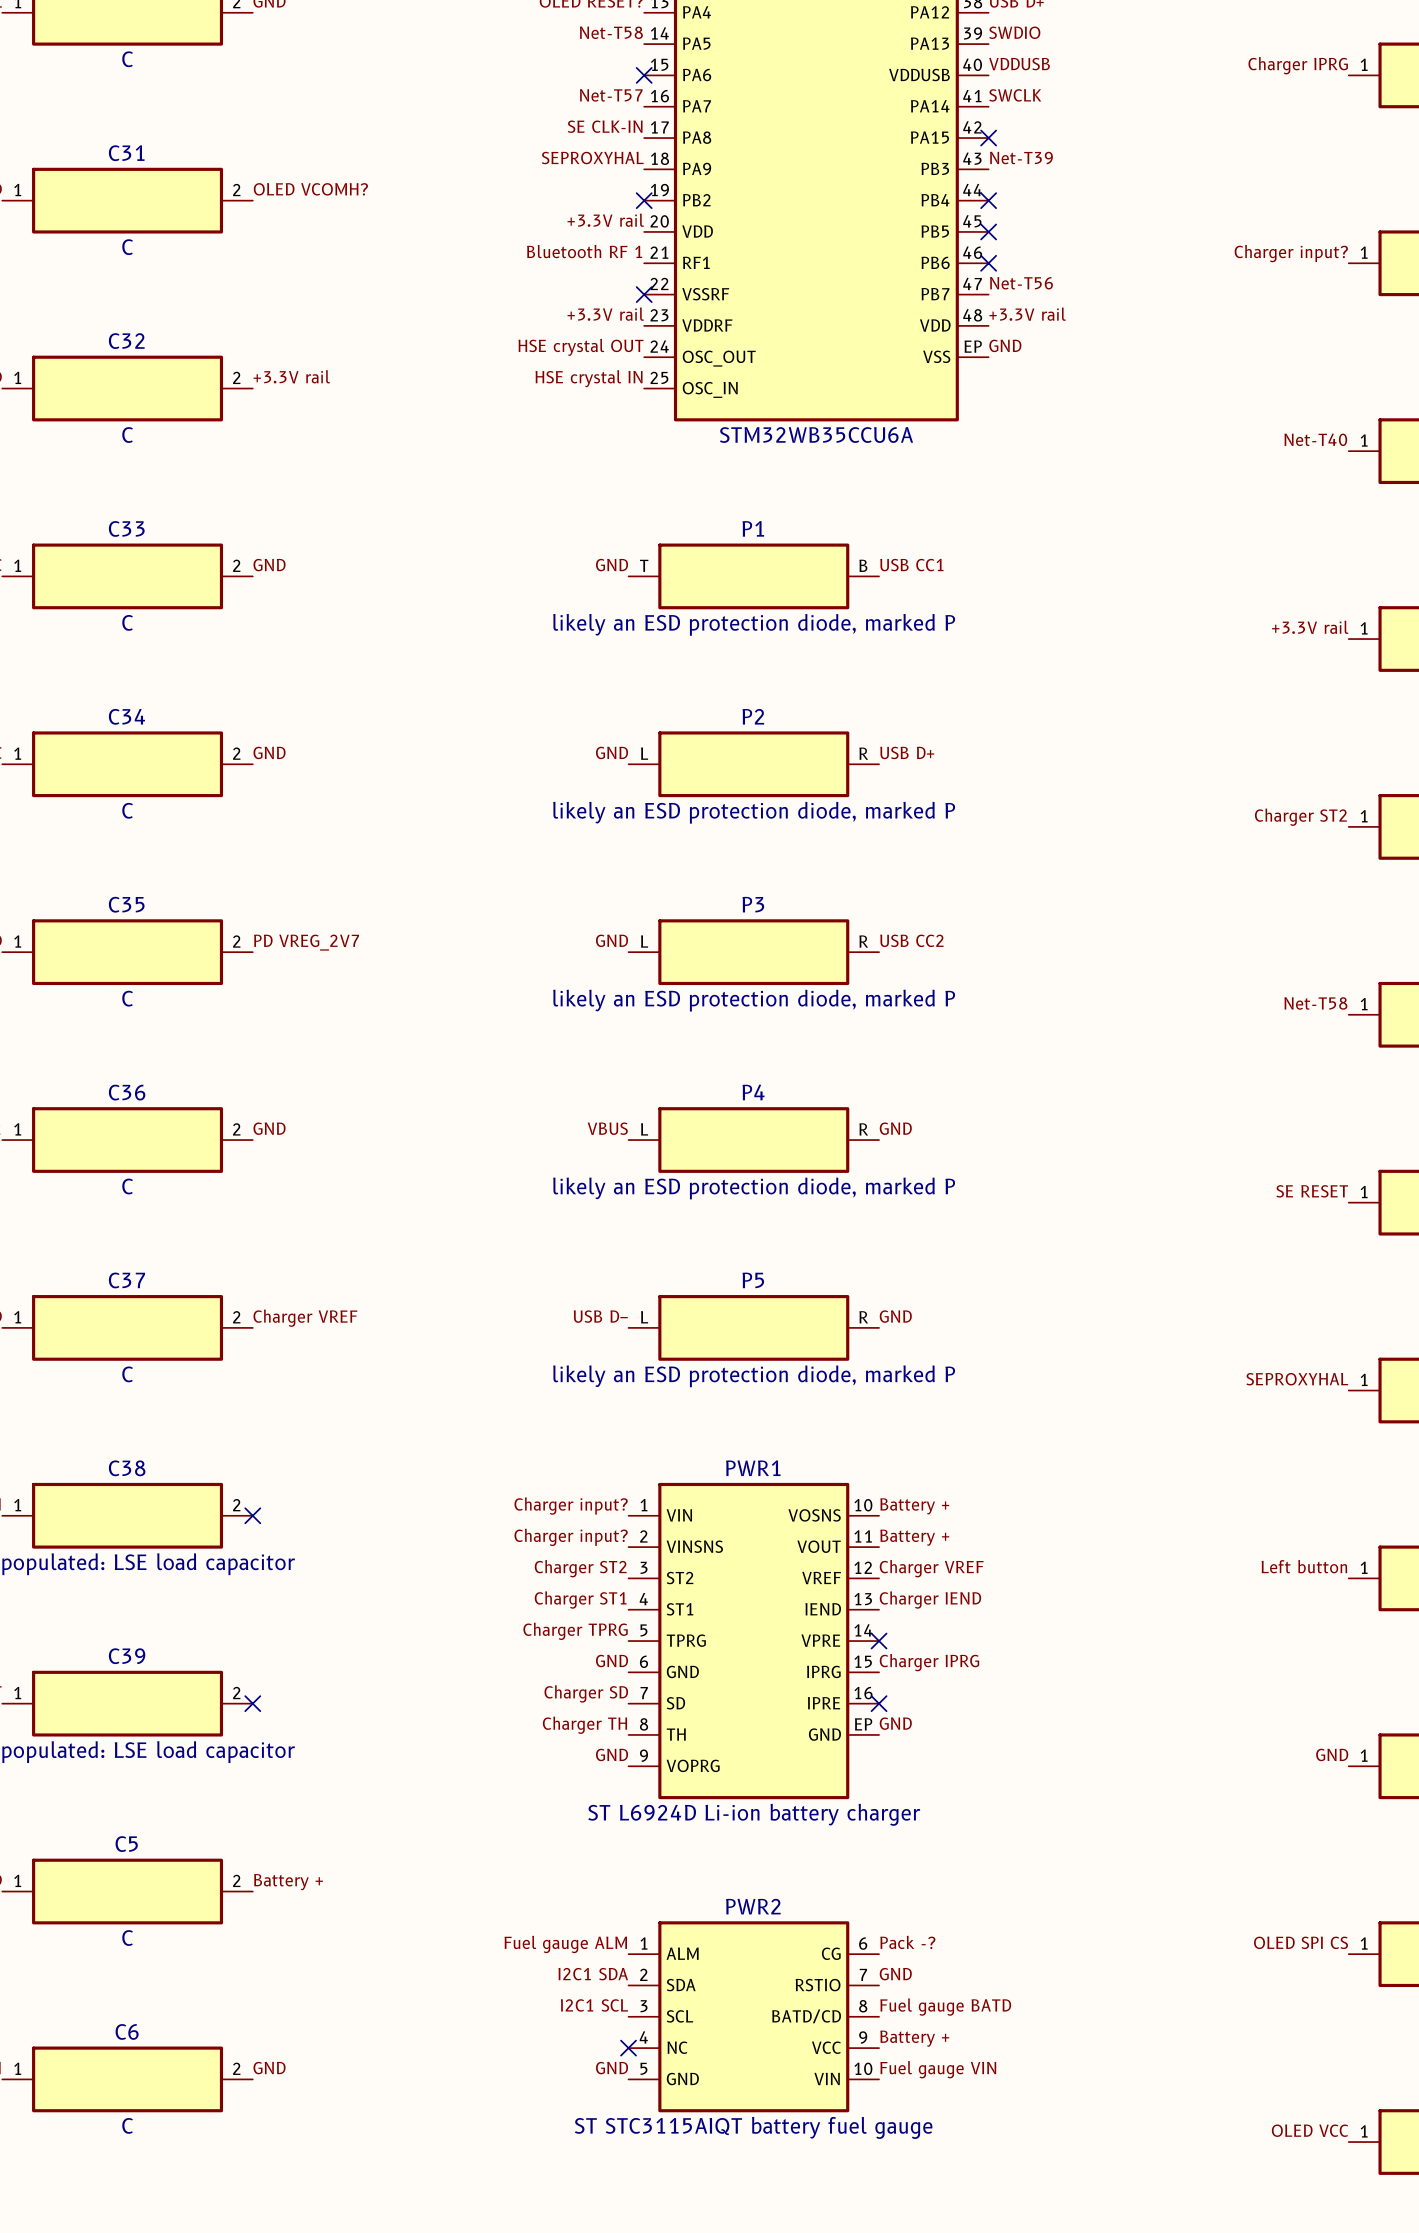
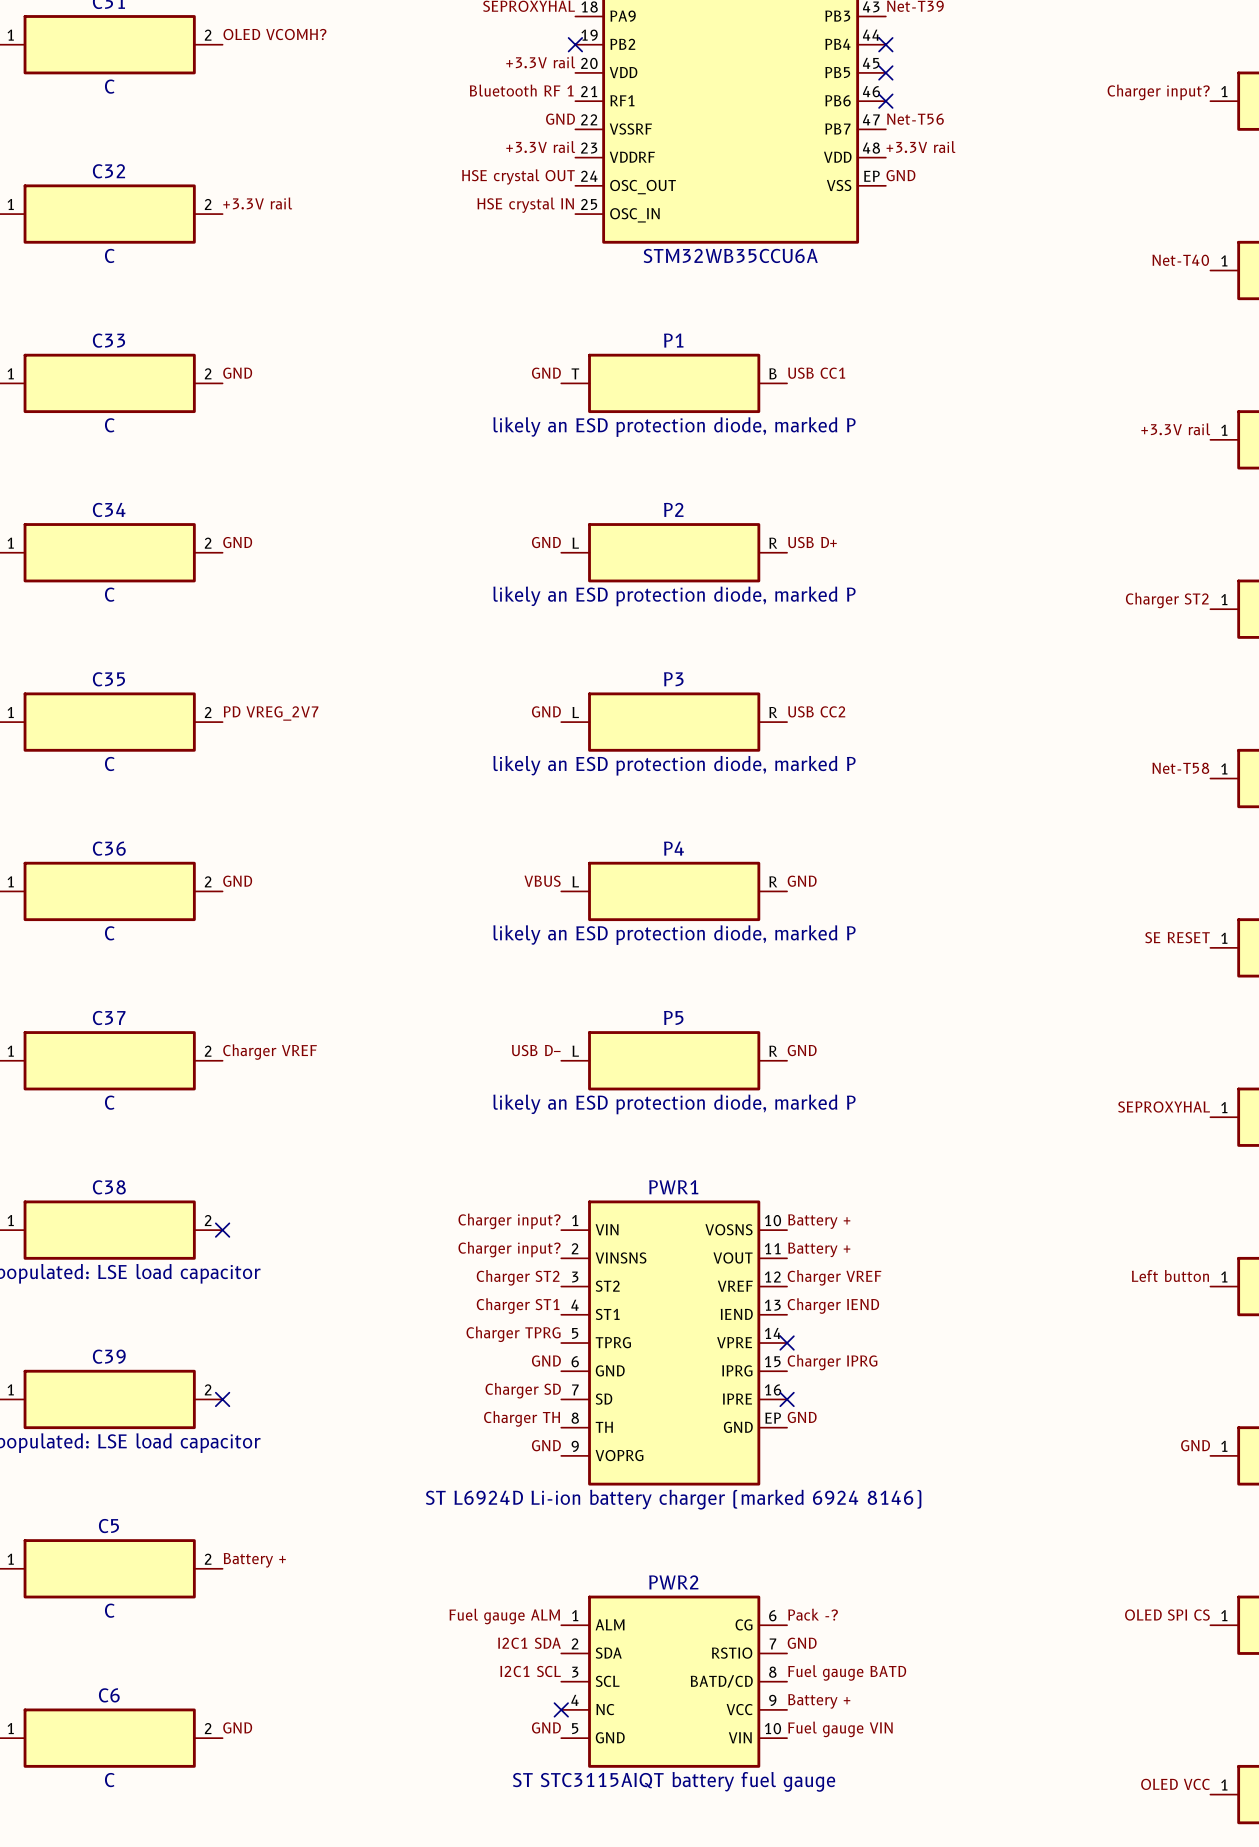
label: none -> GND (560, 119)
no-connect mark: (644, 294) -> none
PWR1 value: ST L6924D Li-ion battery charger (754, 1814) -> ST L6924D Li-ion battery charger (marked 6924 8146) (673, 1499)

